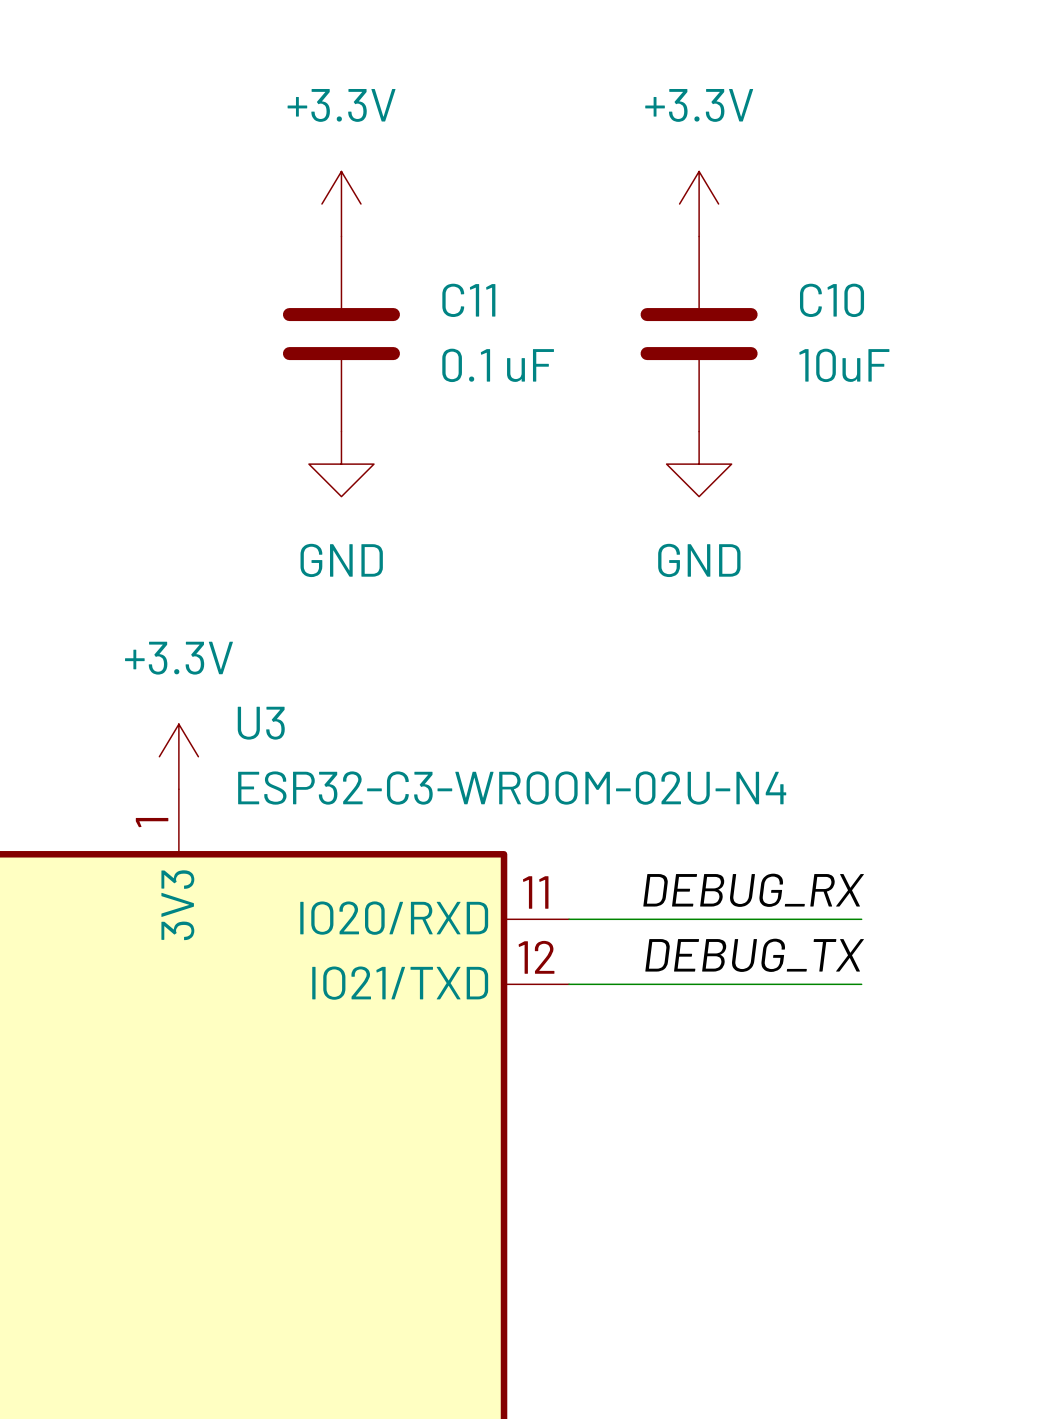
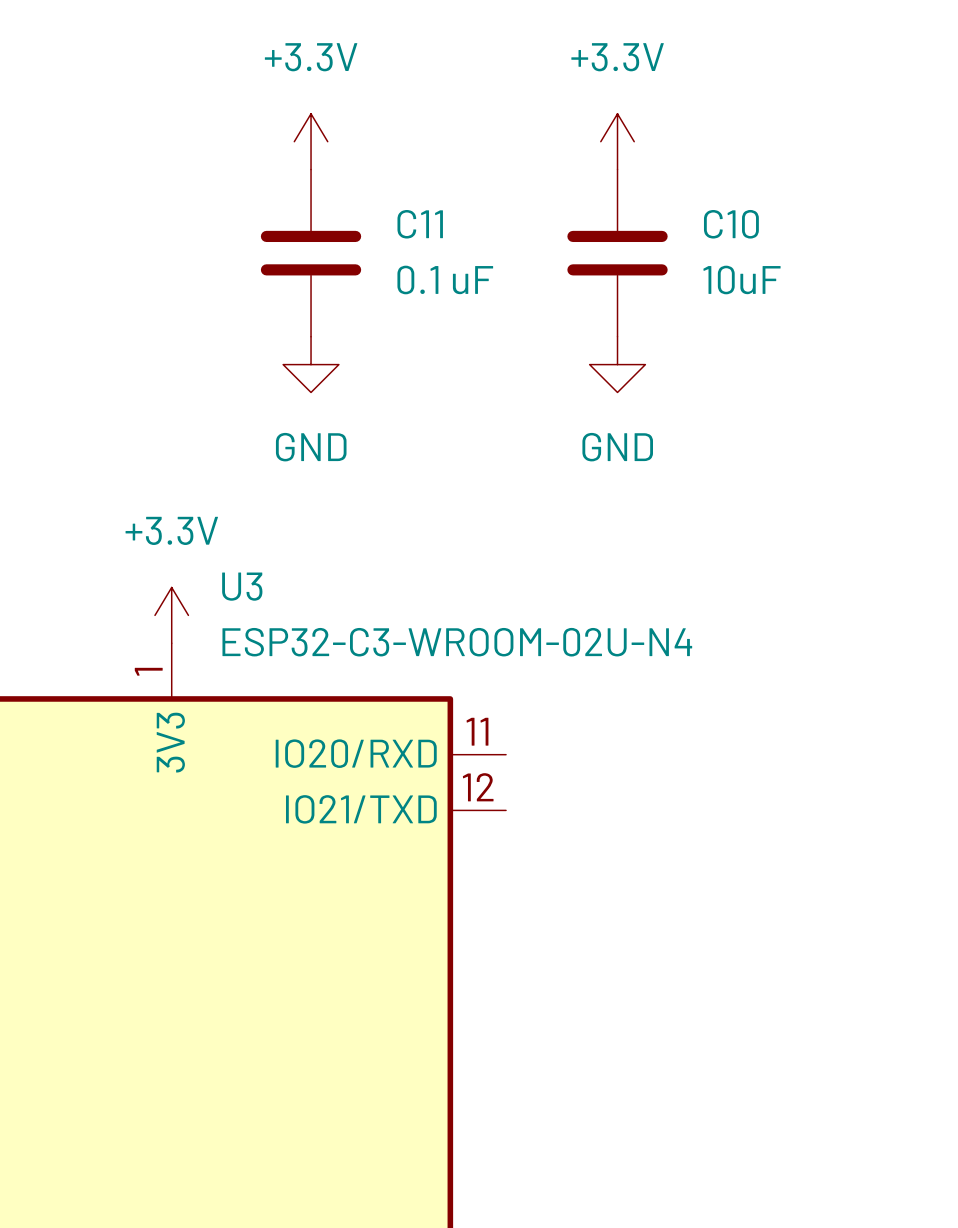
label: DEBUG_RX (753, 890) -> none
wire: (569, 919) (861, 919) -> none
label: DEBUG_TX (754, 955) -> none
wire: (569, 984) (861, 984) -> none

